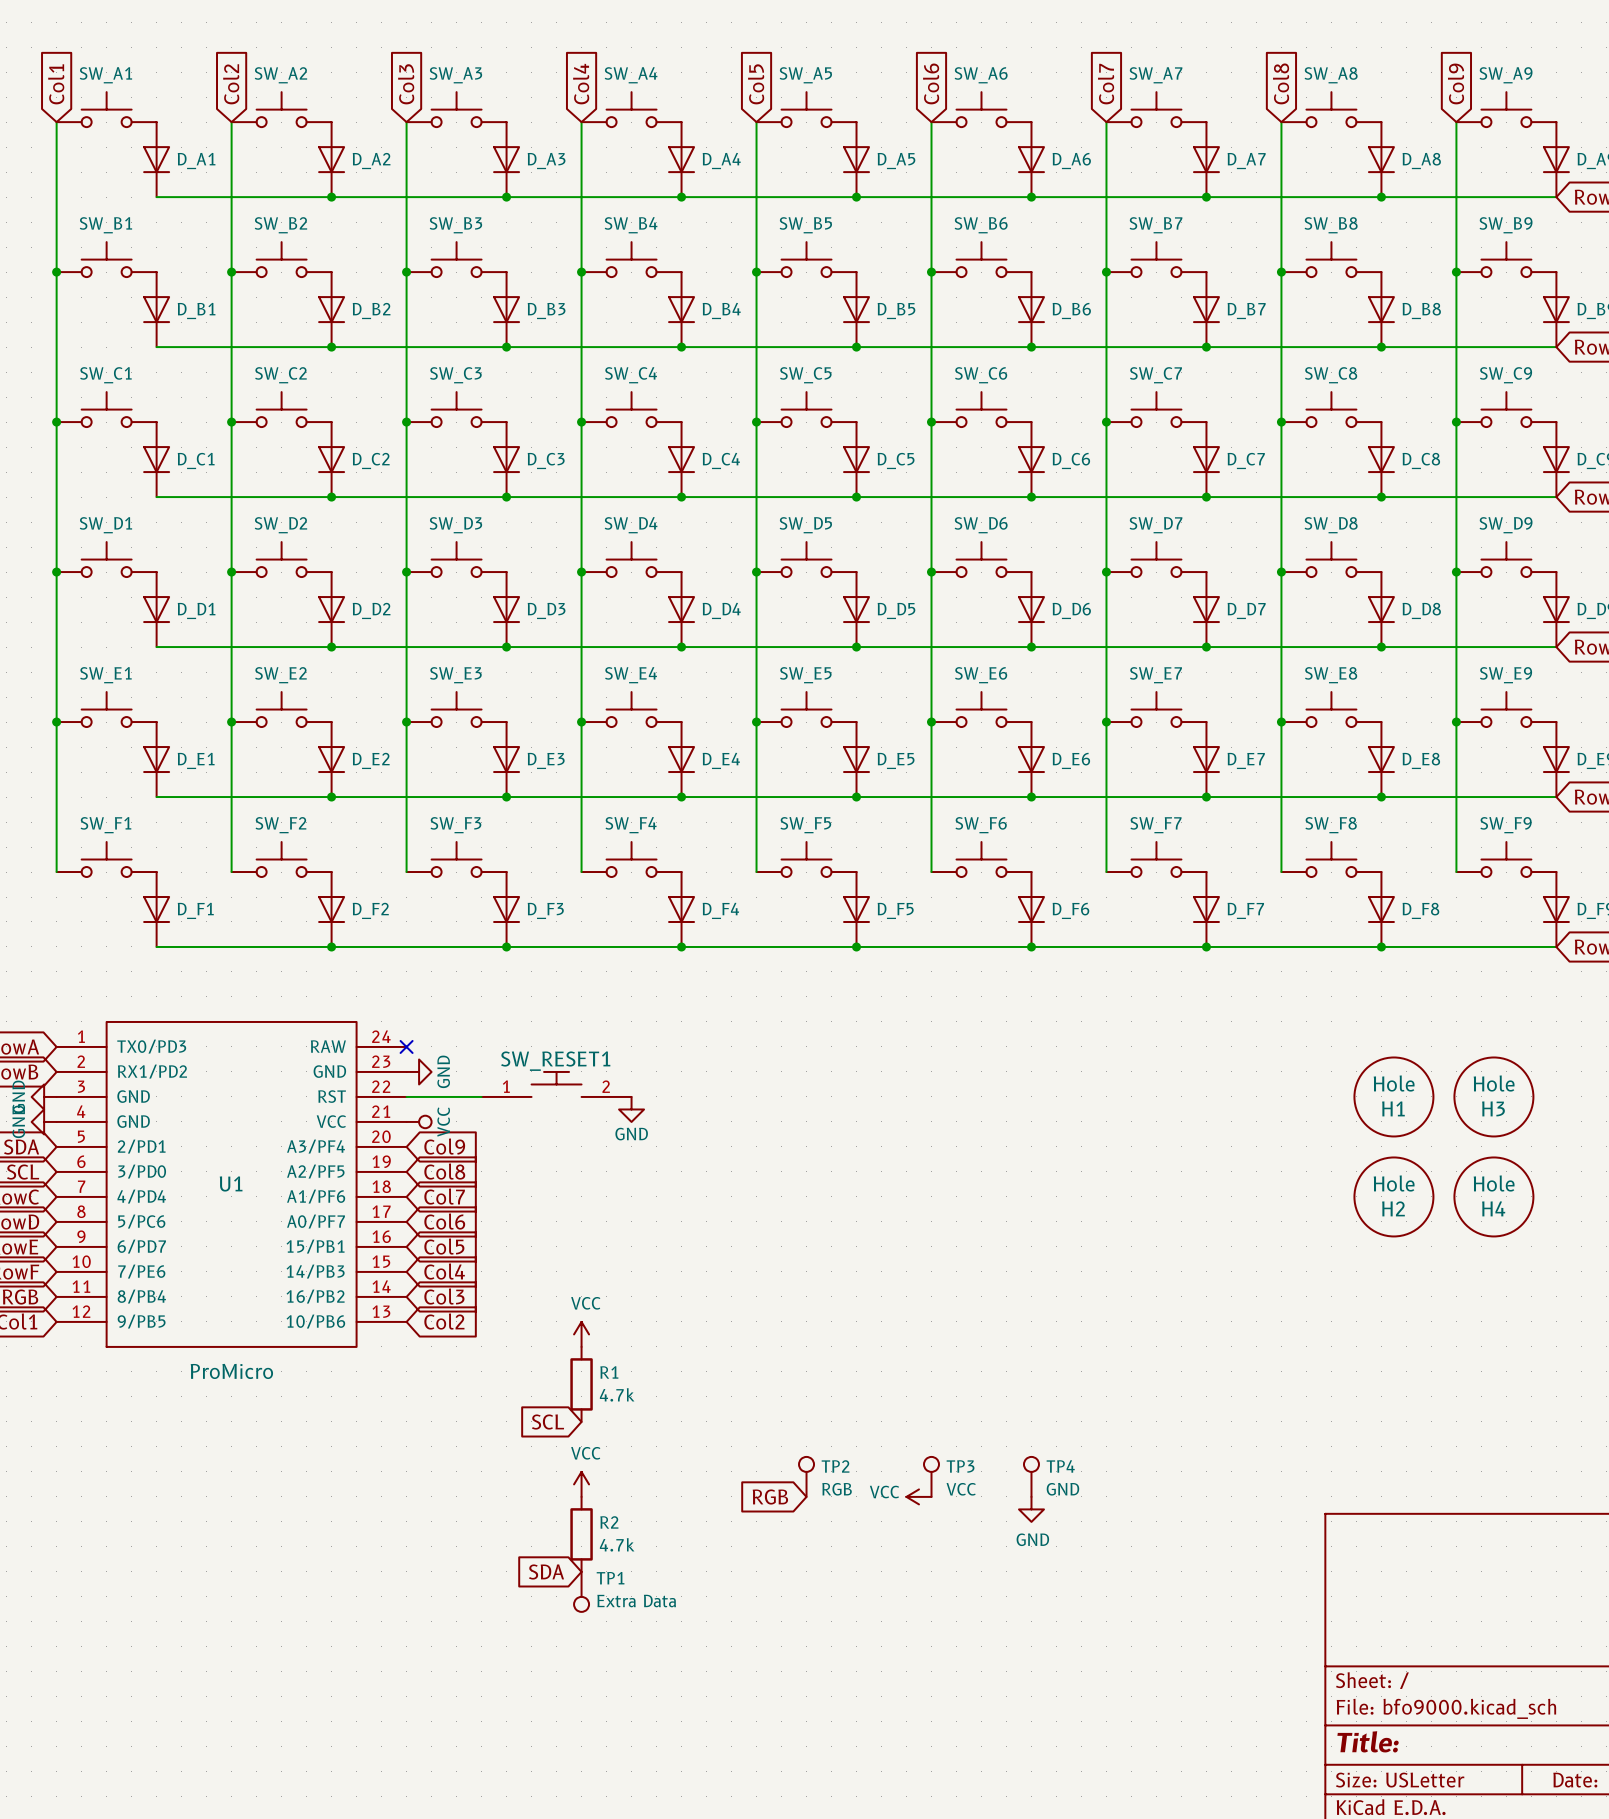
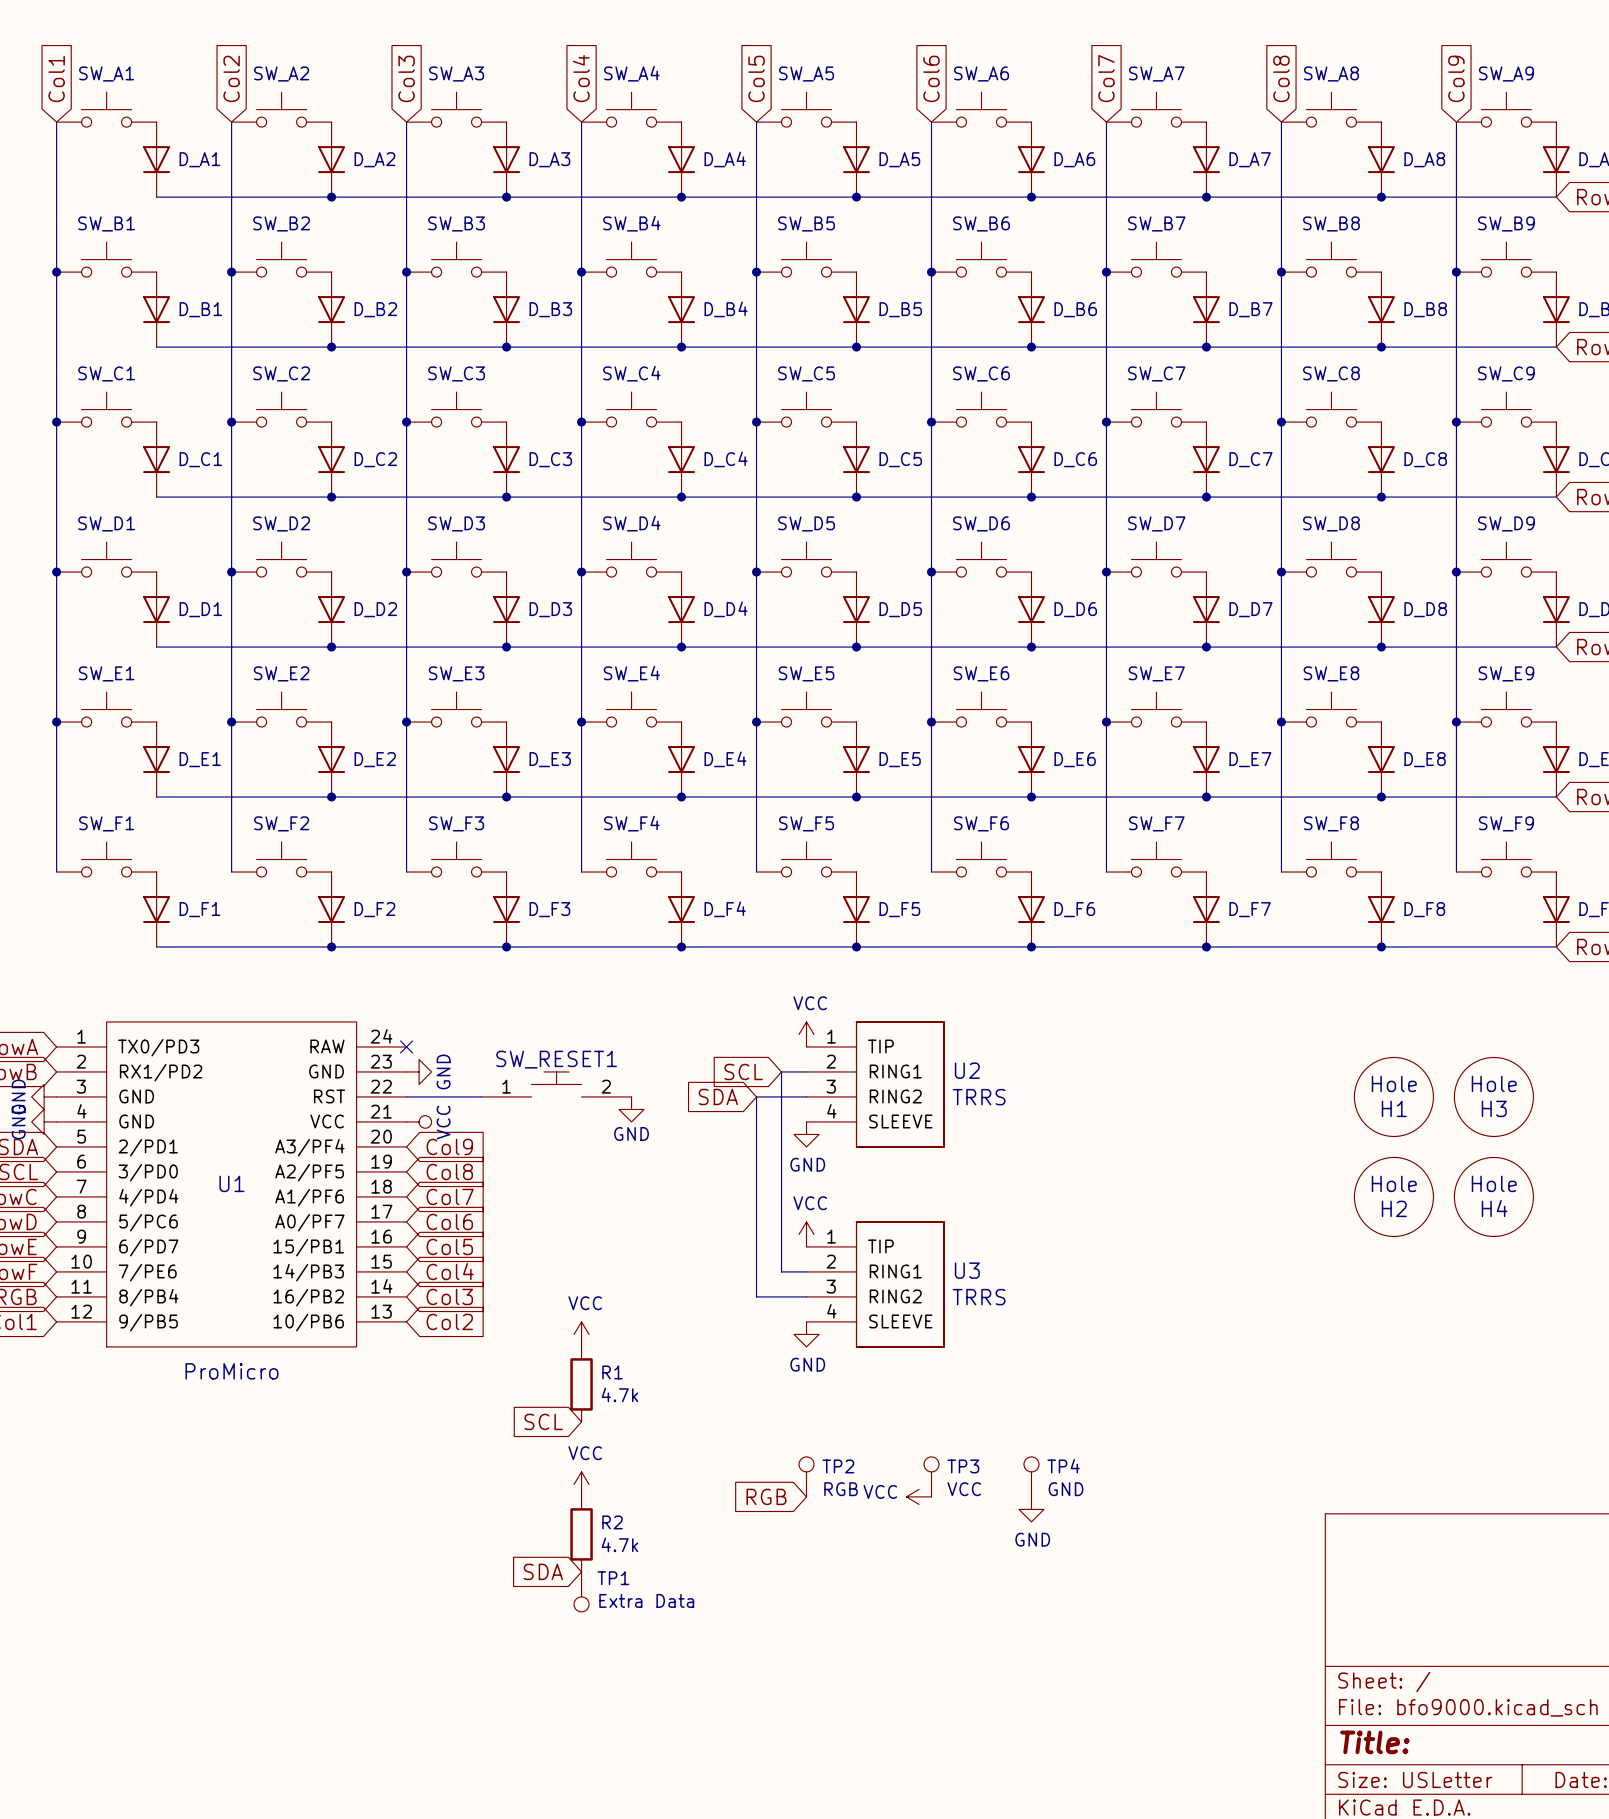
power symbol: none -> VCC (806, 1034)
wire: none -> (806, 1071) (781, 1071) (781, 1271) (806, 1271)
global label: none -> SCL (743, 1071)
U2: none -> TRRS (875, 1084)
wire: none -> (806, 1096) (756, 1096) (756, 1296) (806, 1296)
global label: none -> SDA (718, 1096)
power symbol: none -> GND (806, 1134)
power symbol: none -> VCC (806, 1234)
U3: none -> TRRS (875, 1284)
power symbol: none -> GND (806, 1334)

